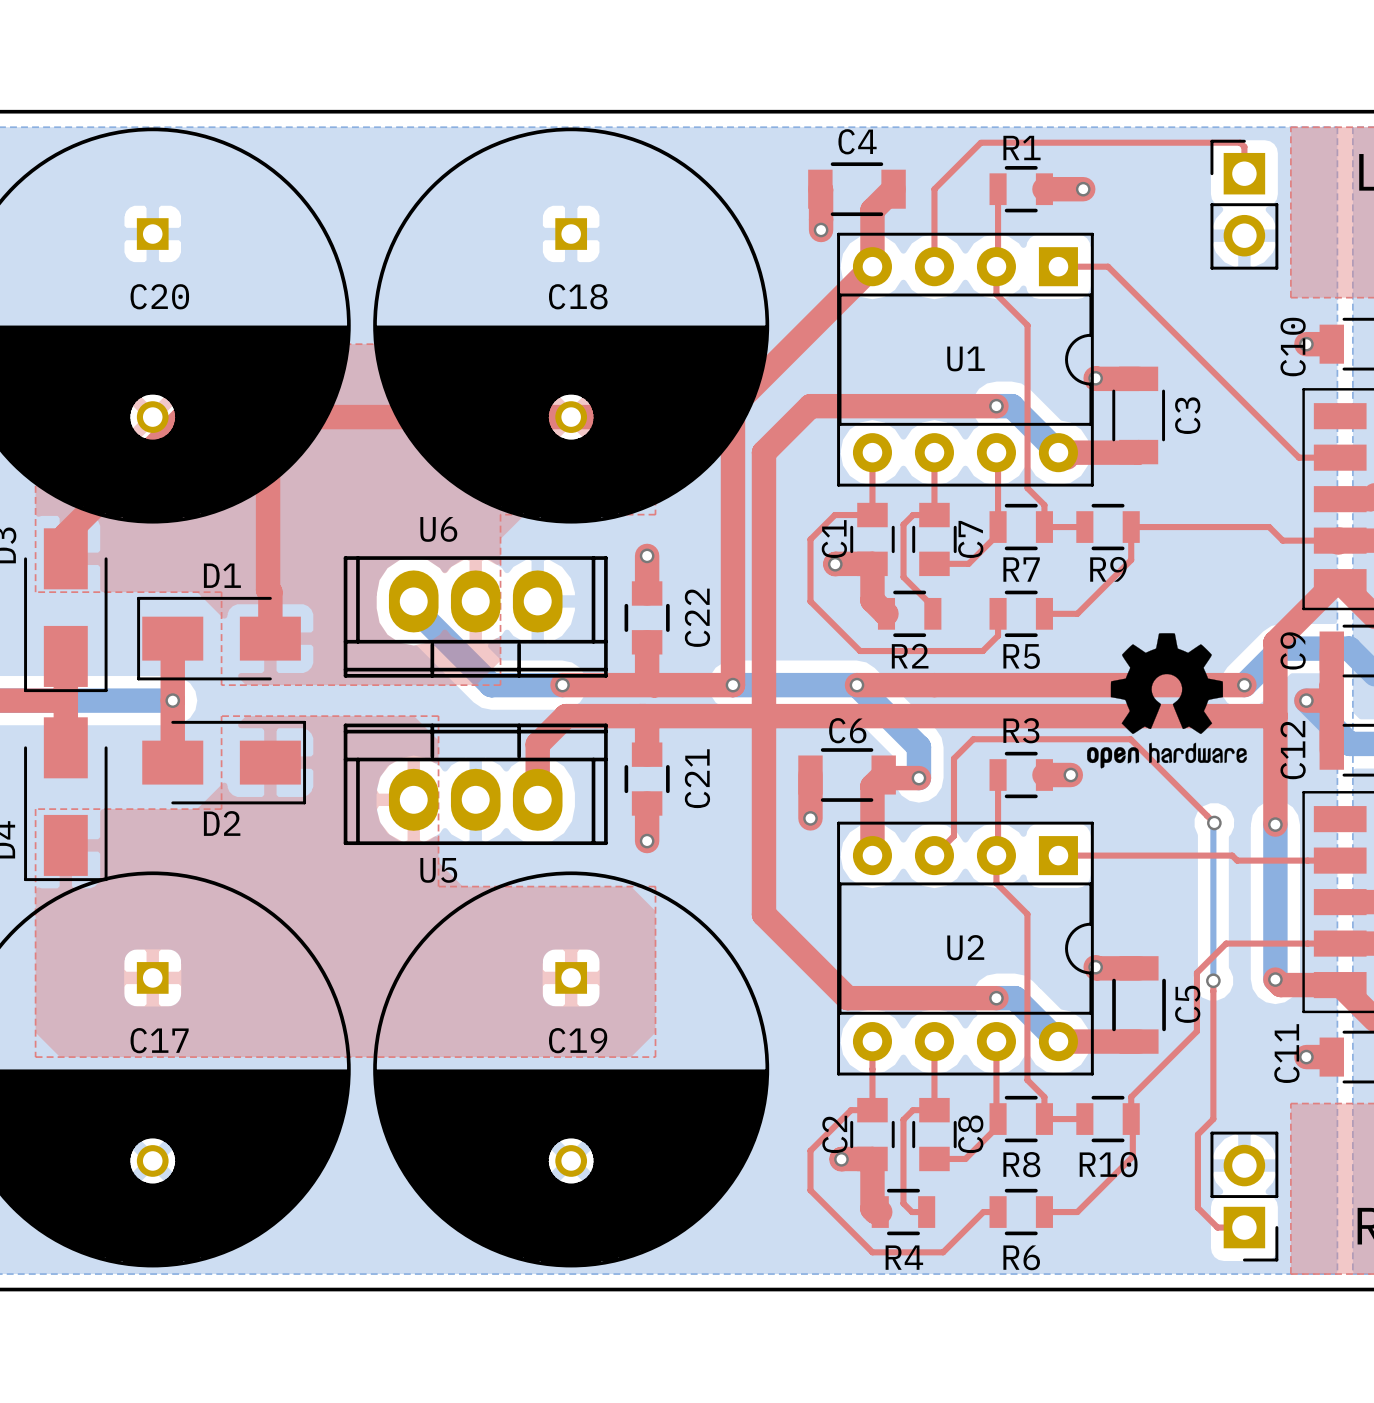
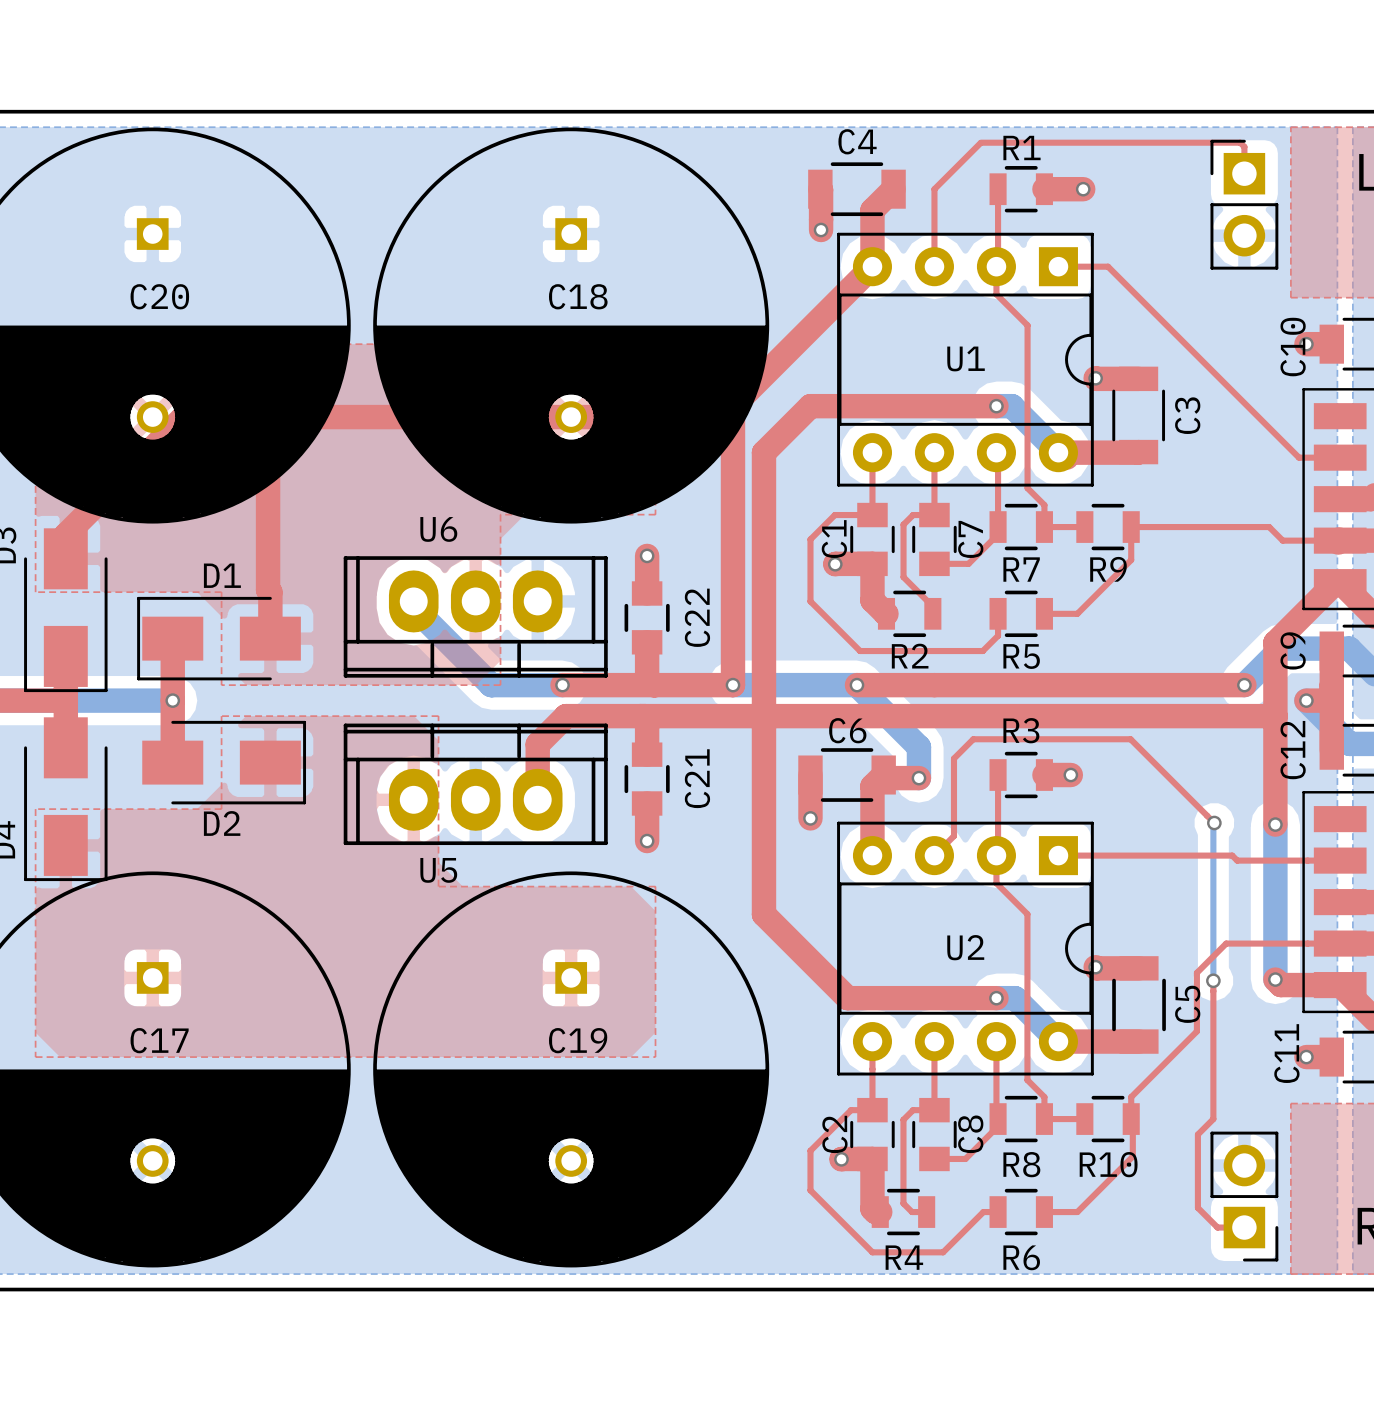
drawing: [1087, 633, 1247, 769] -> none

